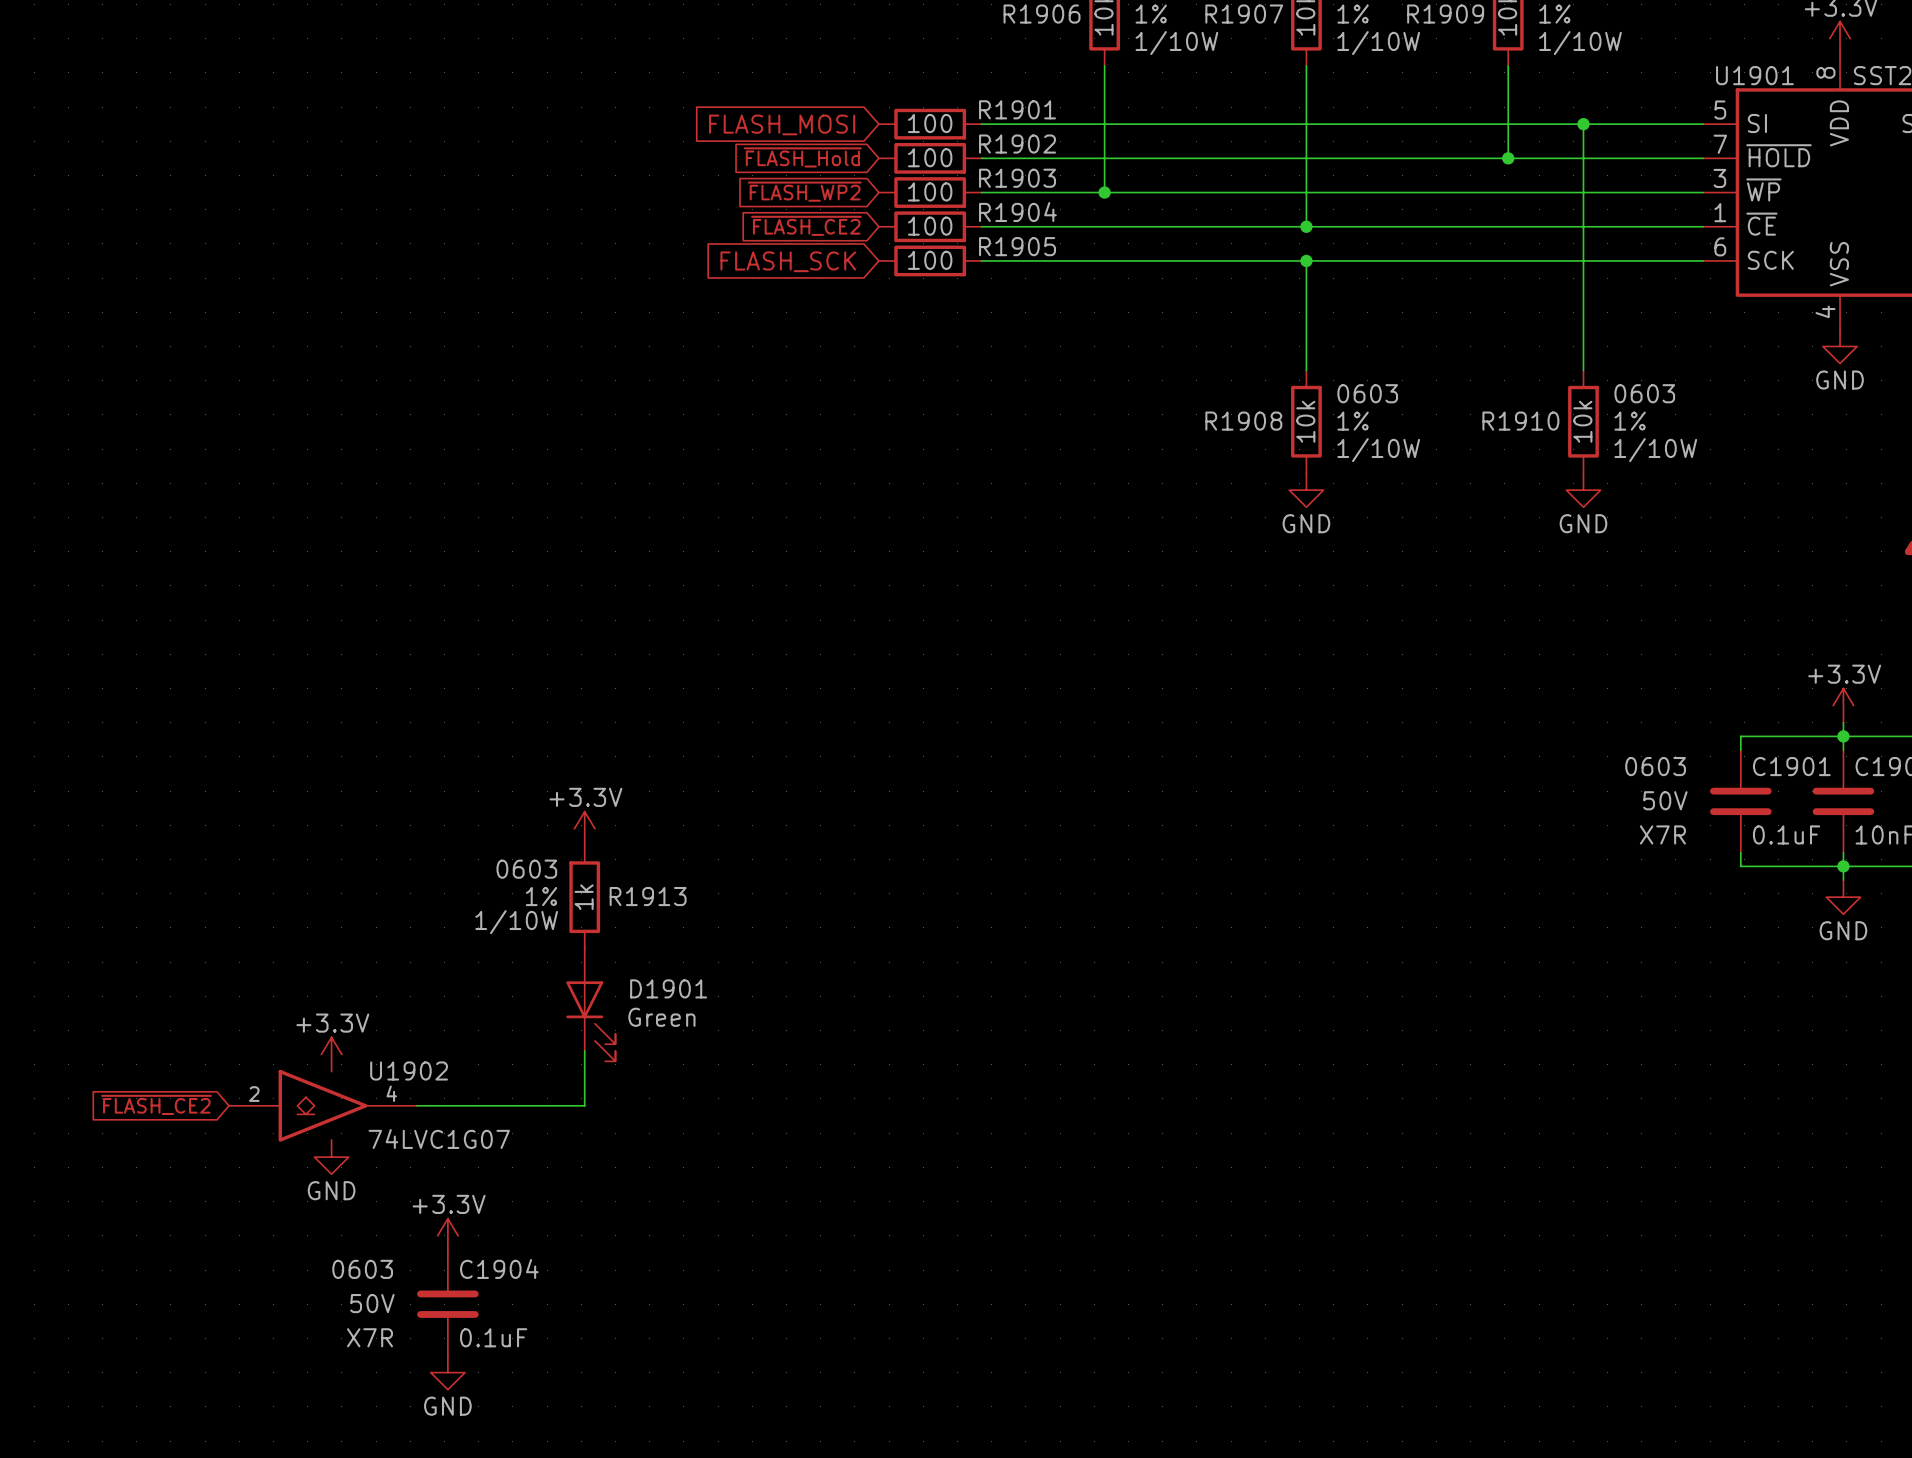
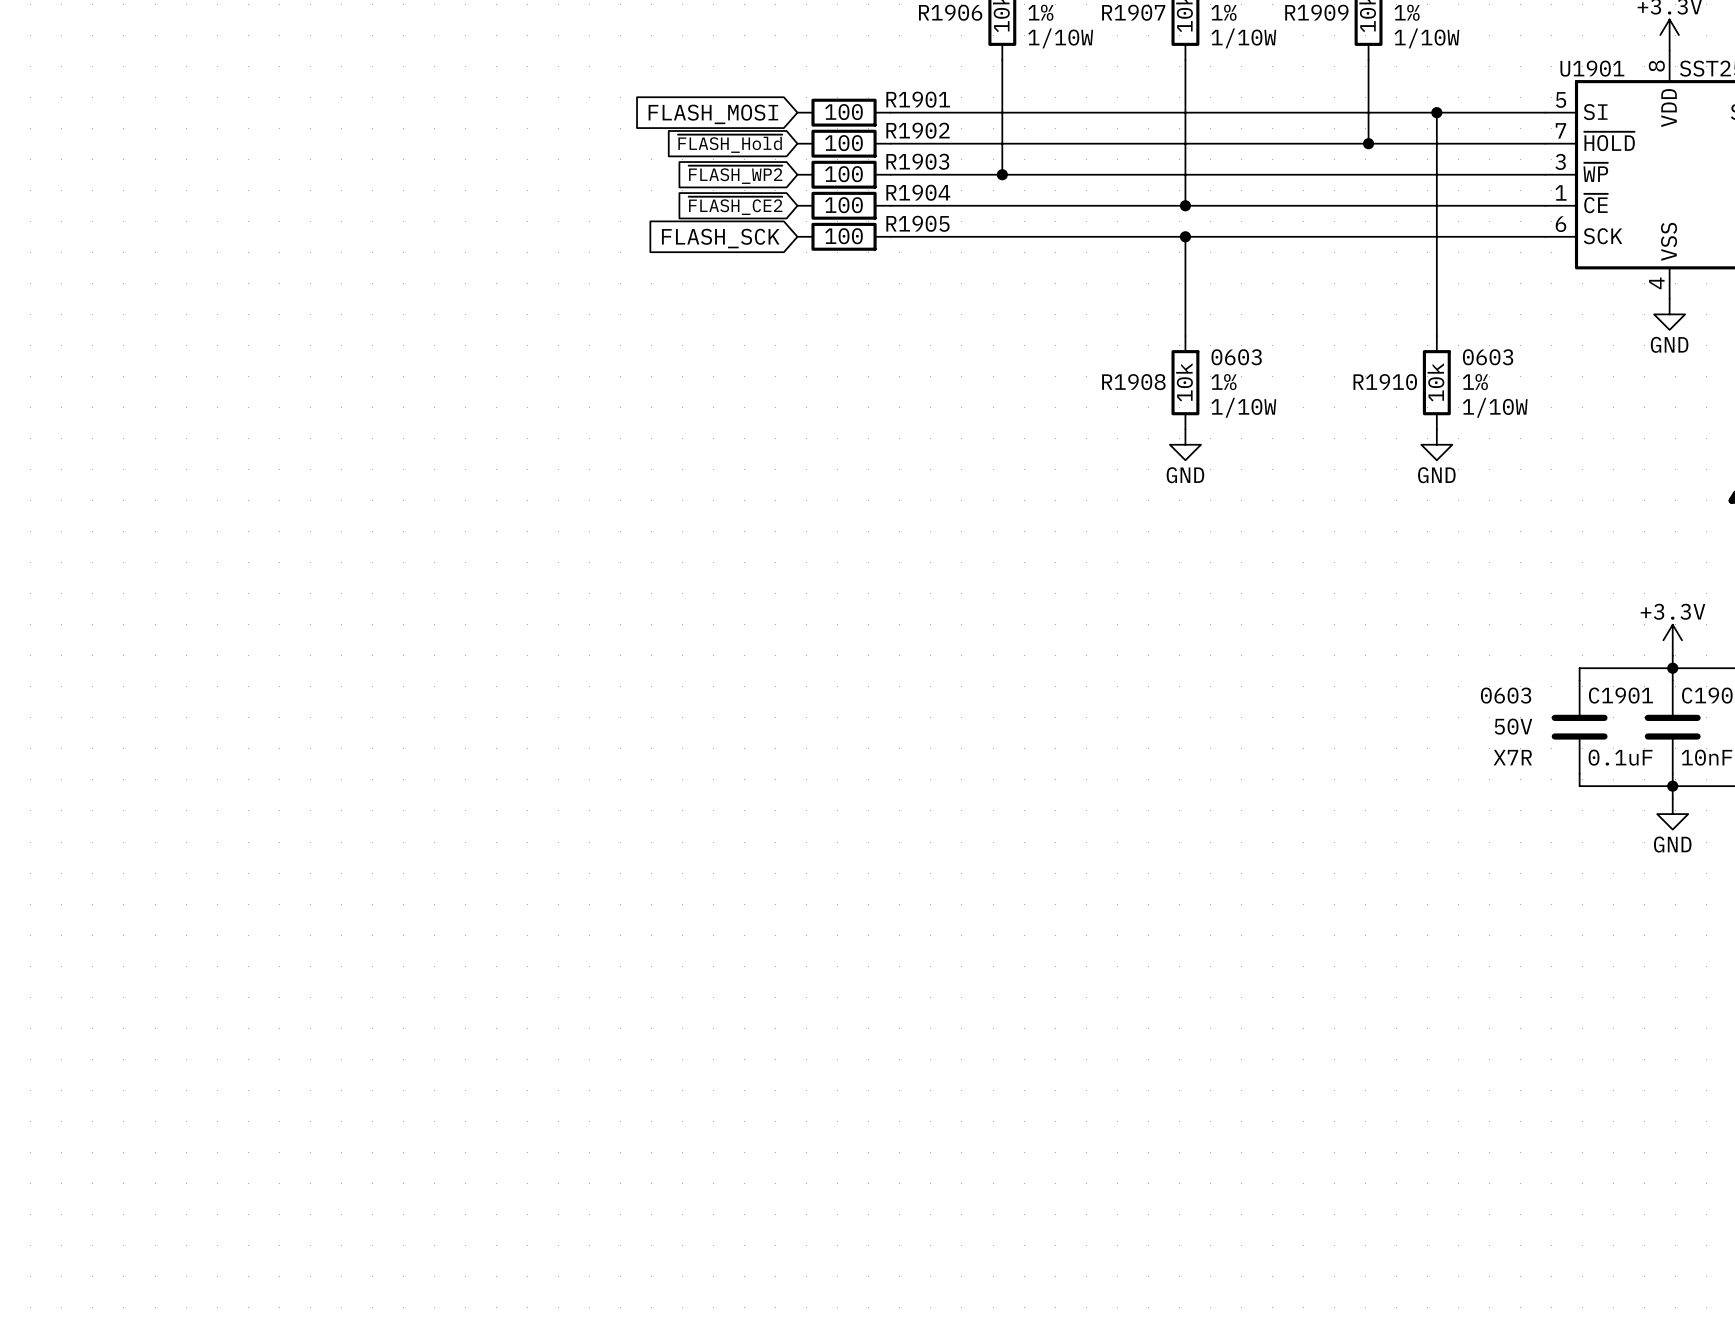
power symbol: +3.3V (584, 828) -> none
R1913: 1k (584, 897) -> none
D1901: Green (590, 1004) -> none
wire: (584, 1051) (584, 1105) (417, 1105) -> none
power symbol: +3.3V (331, 1054) -> none
global label: ~{FLASH_CE2} (156, 1104) -> none
U1902: 74LVC1G07 (323, 1105) -> none
power symbol: GND (331, 1157) -> none
power symbol: +3.3V (447, 1235) -> none
C1904: 0.1uF (447, 1304) -> none
power symbol: GND (447, 1372) -> none

